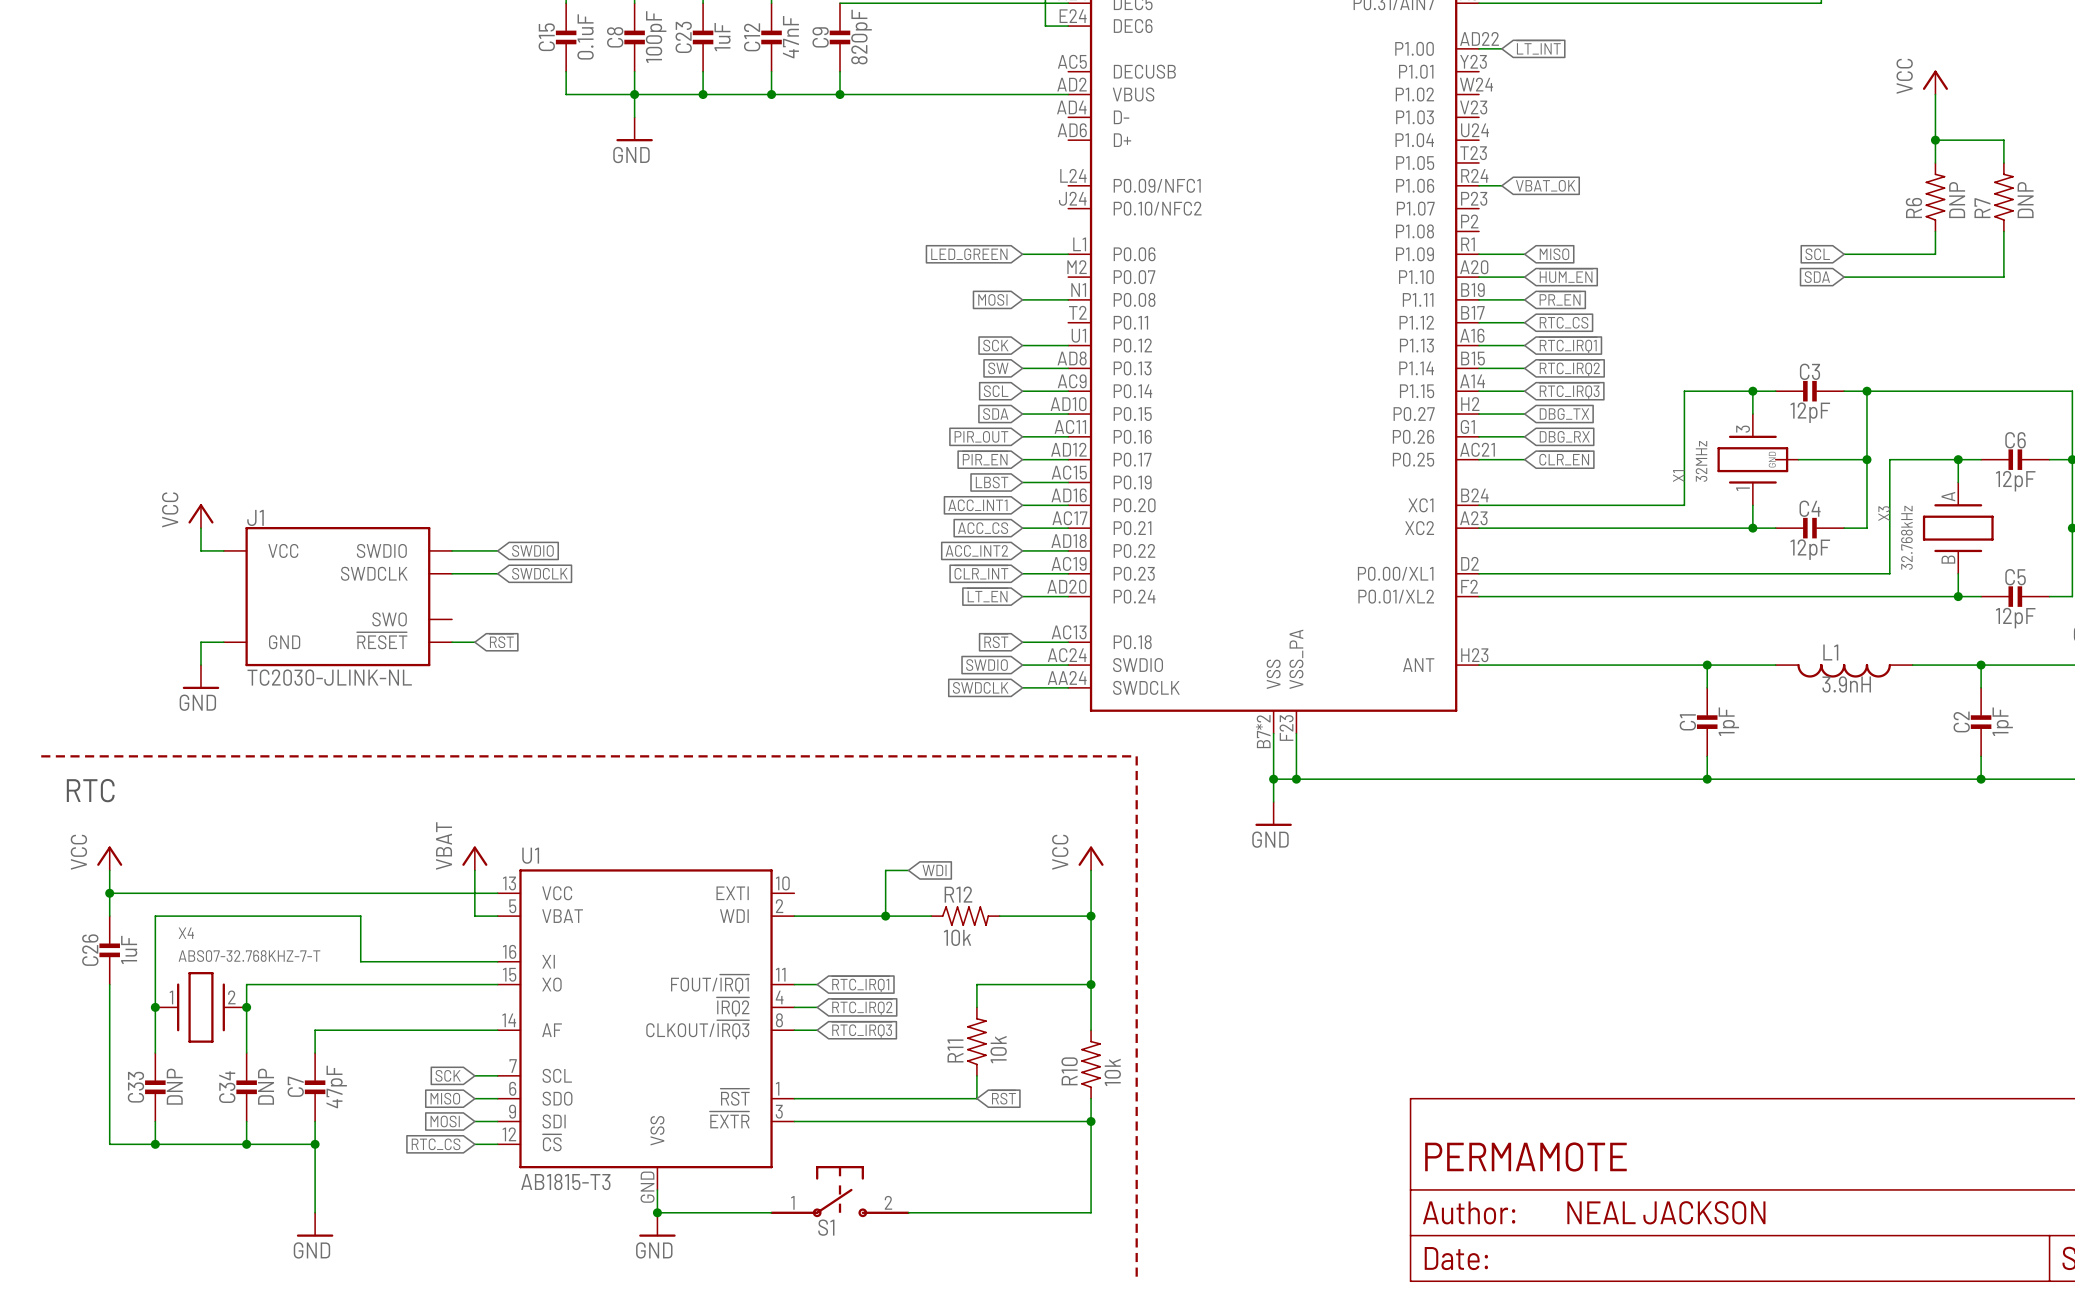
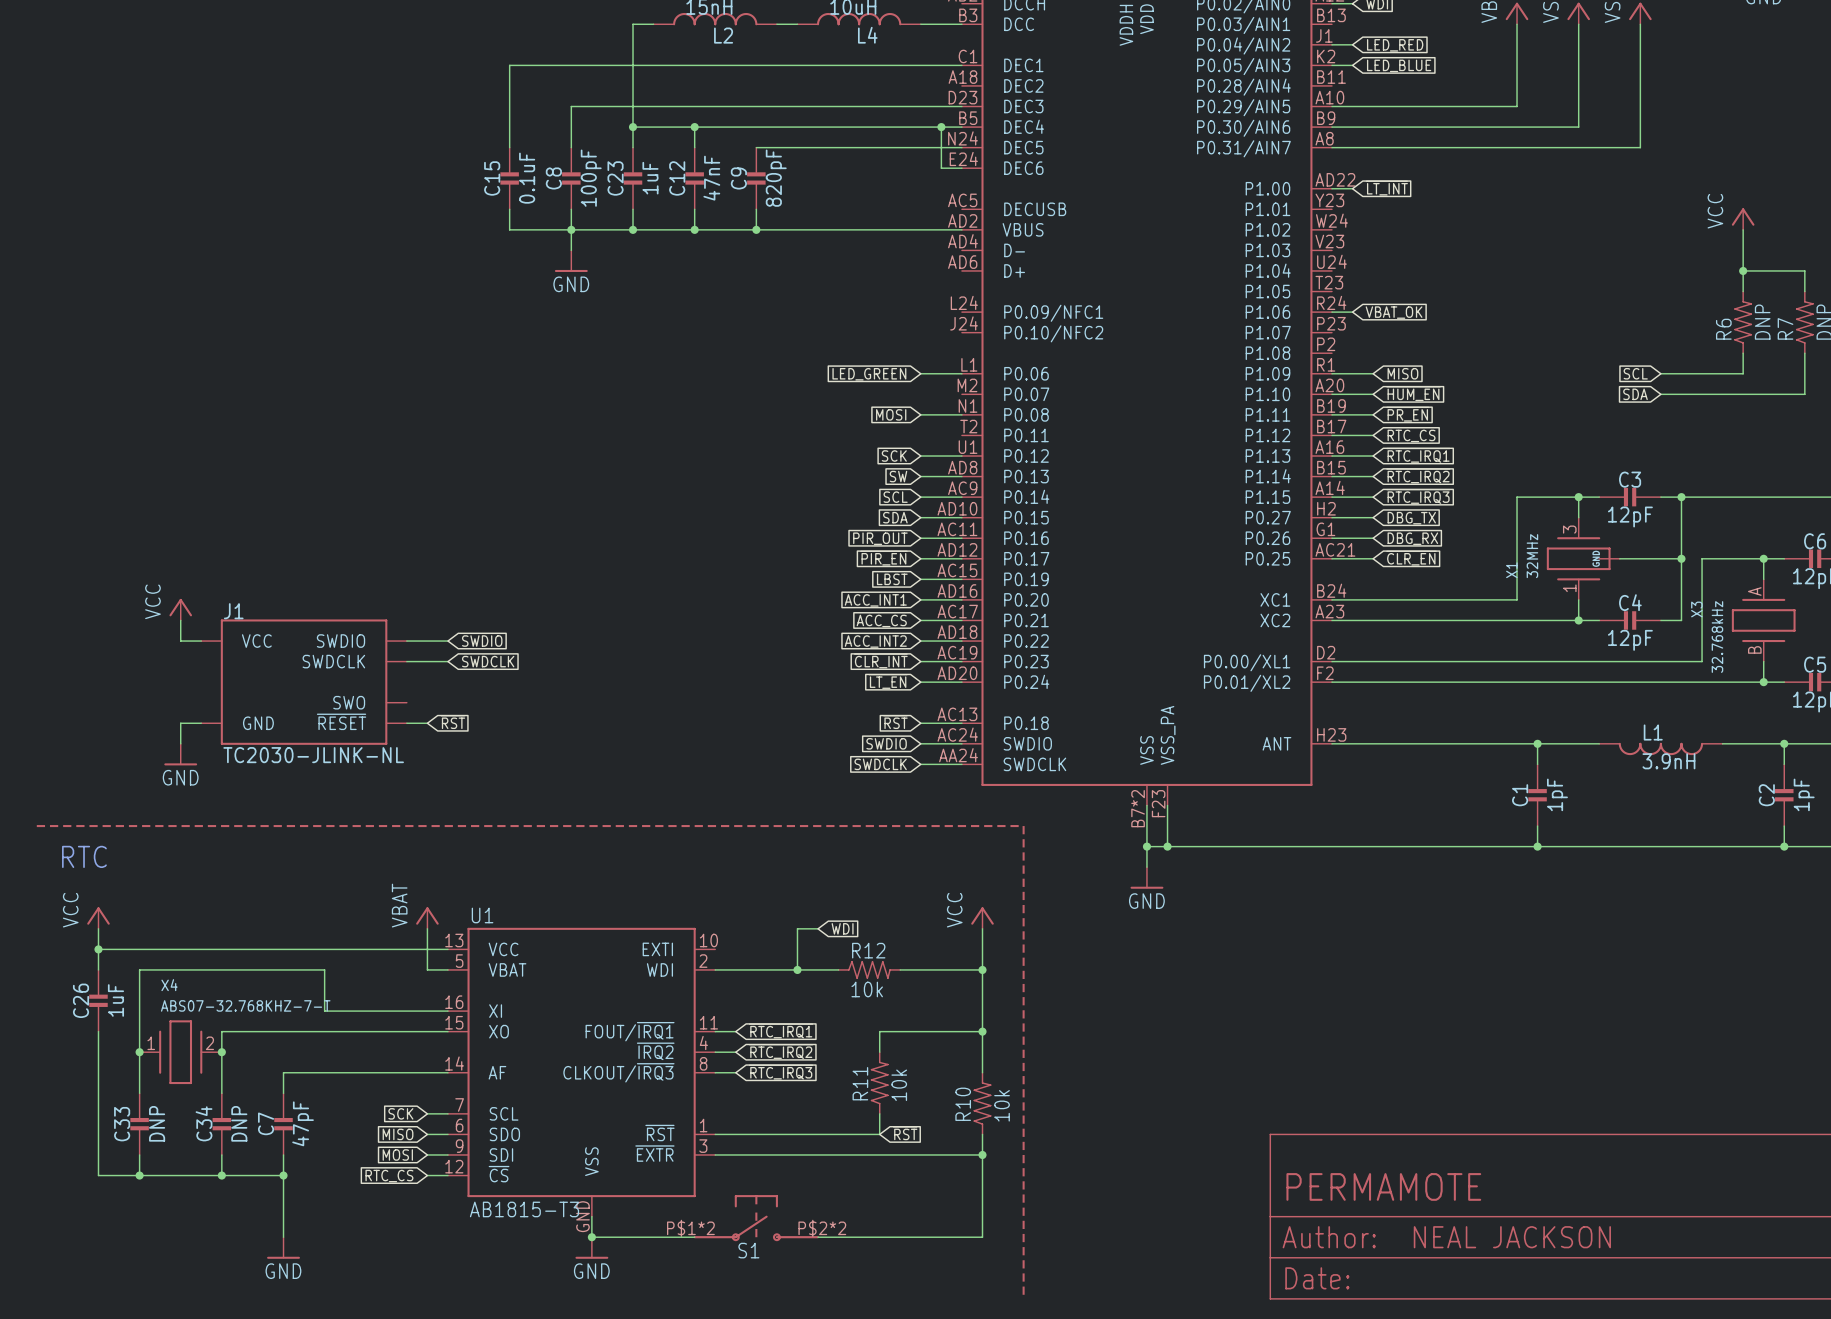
S1 pin number: 1 (792, 1202) -> P$1*2 (690, 1228)
S1 pin number: 2 (888, 1202) -> P$2*2 (822, 1228)

